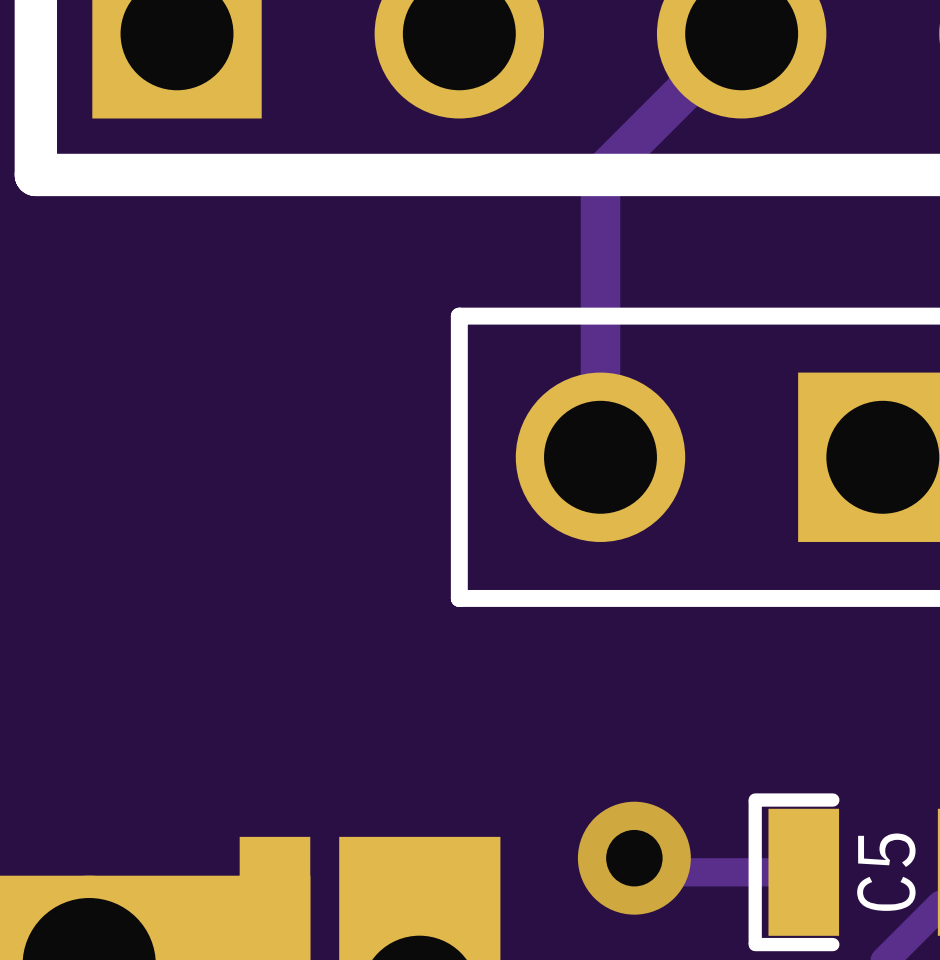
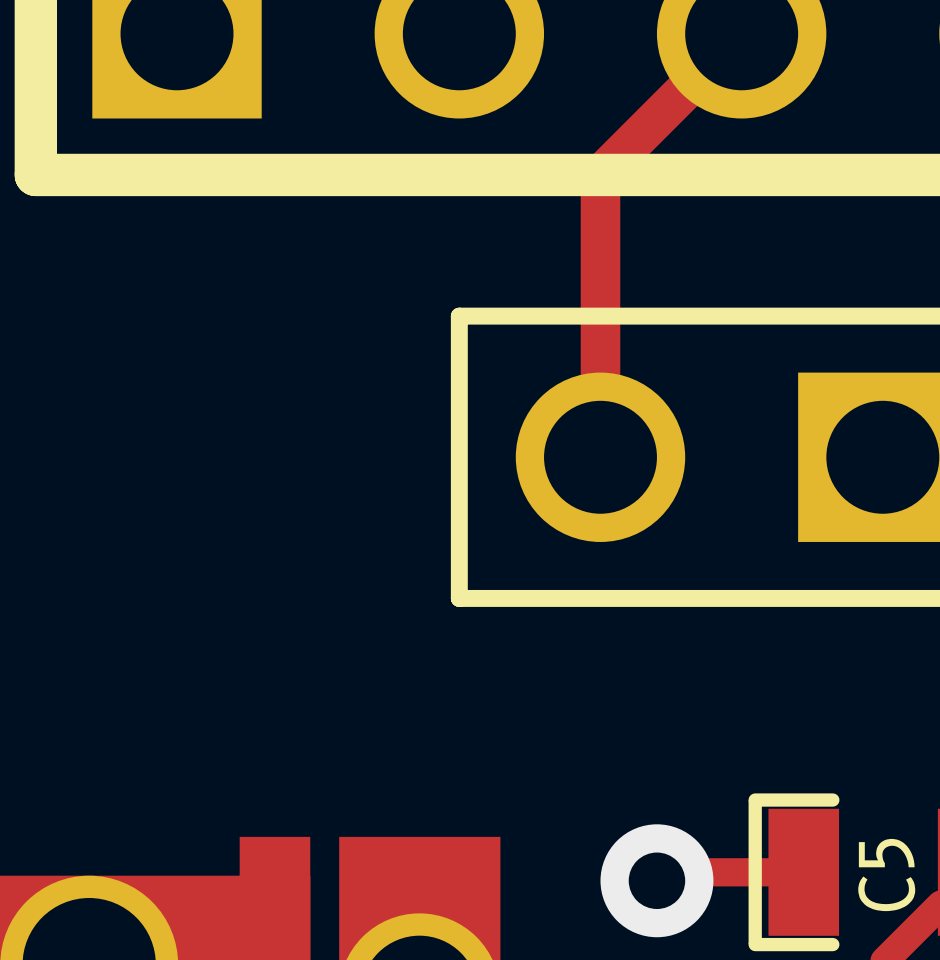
via position: (634, 858) -> (656, 880)

